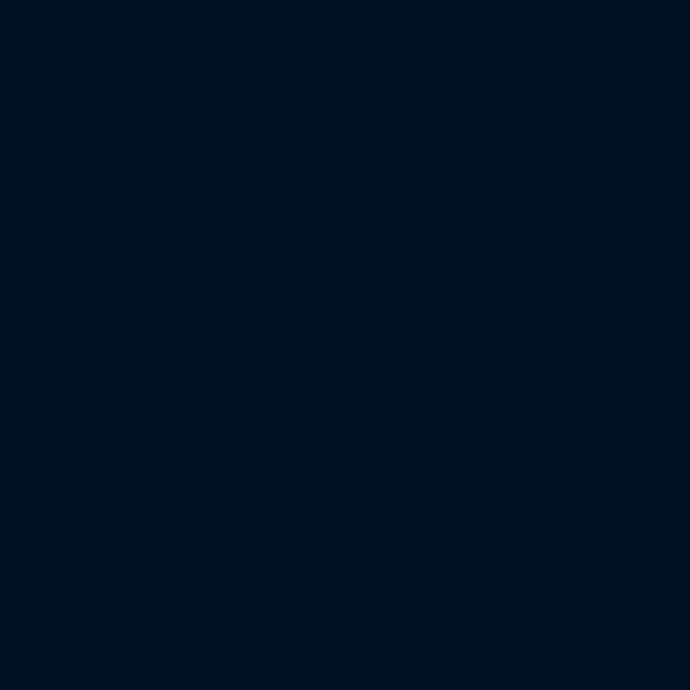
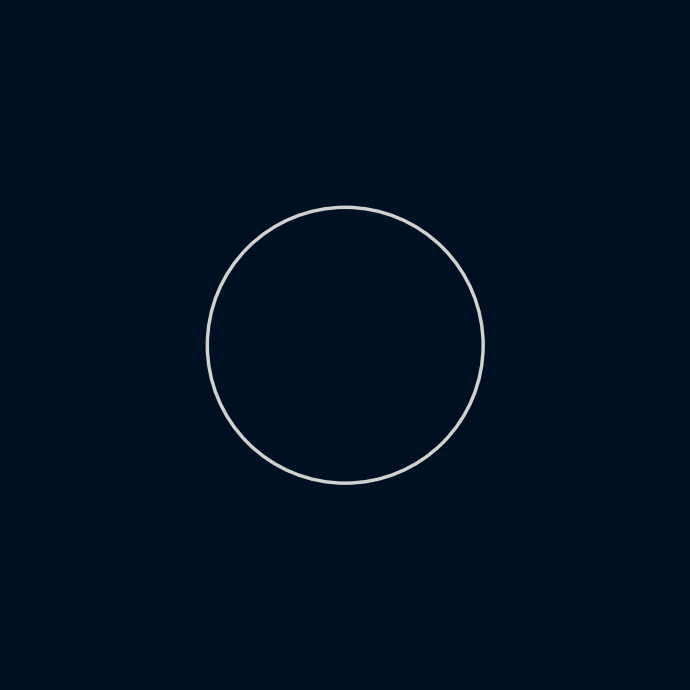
round board edge: none -> [205, 205, 485, 485]

